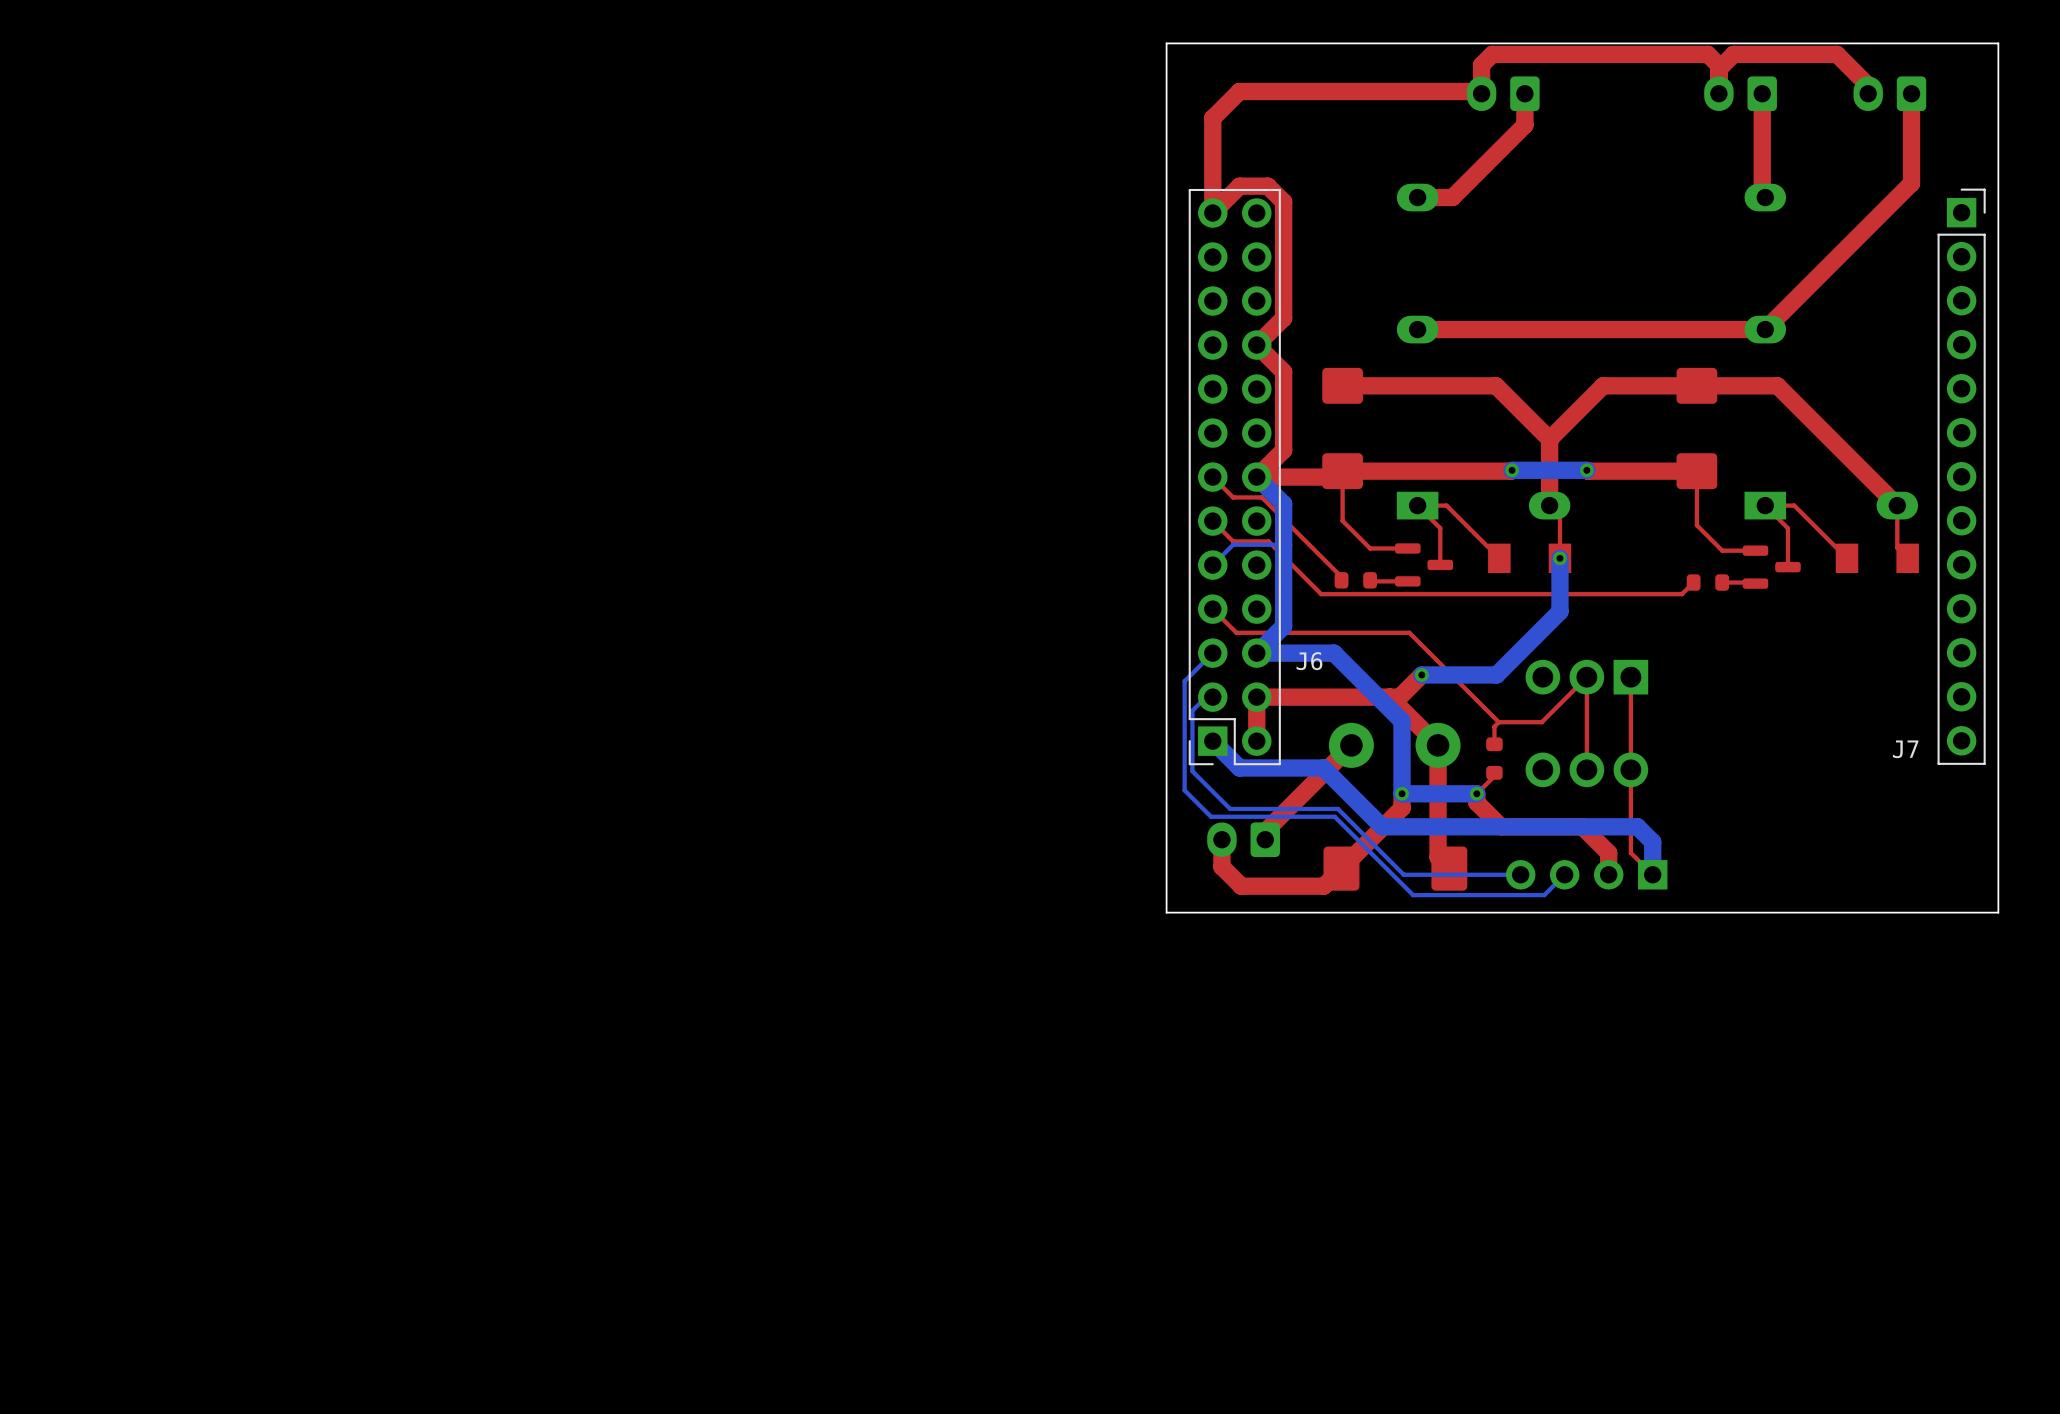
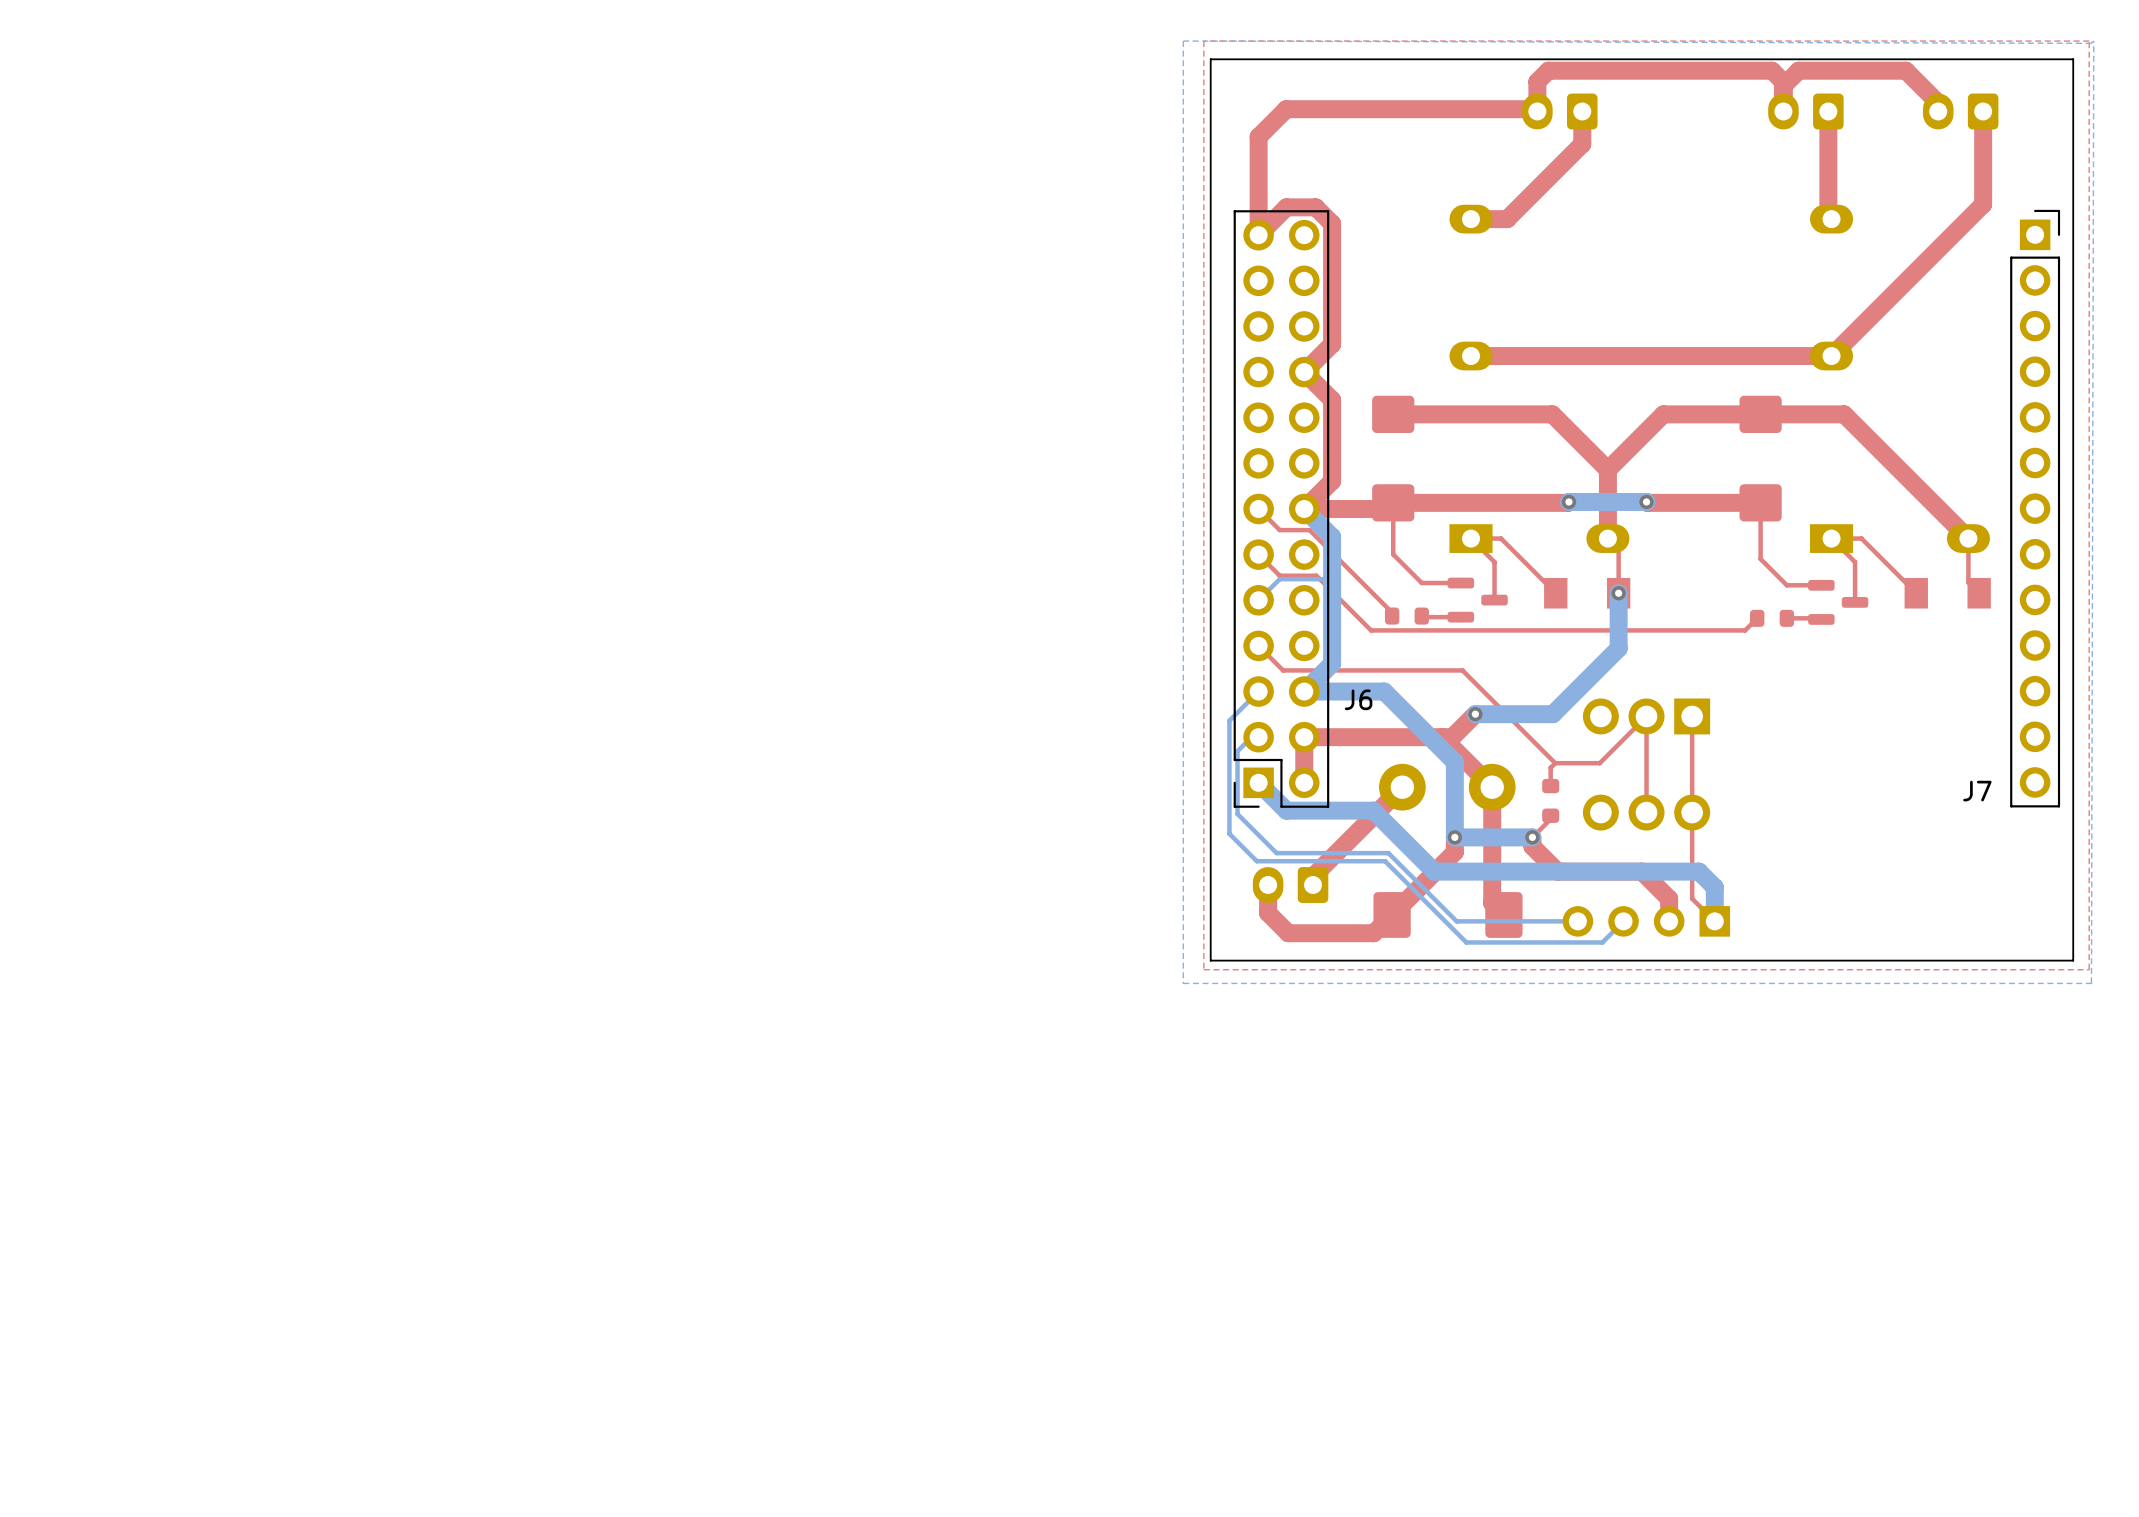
top zone outline: none -> (2089, 41) (2089, 969) (1203, 969) (1203, 41) (2089, 41)
bottom zone outline: none -> (2093, 41) (2091, 983) (1183, 983) (1183, 41) (2091, 43) (2093, 41)

